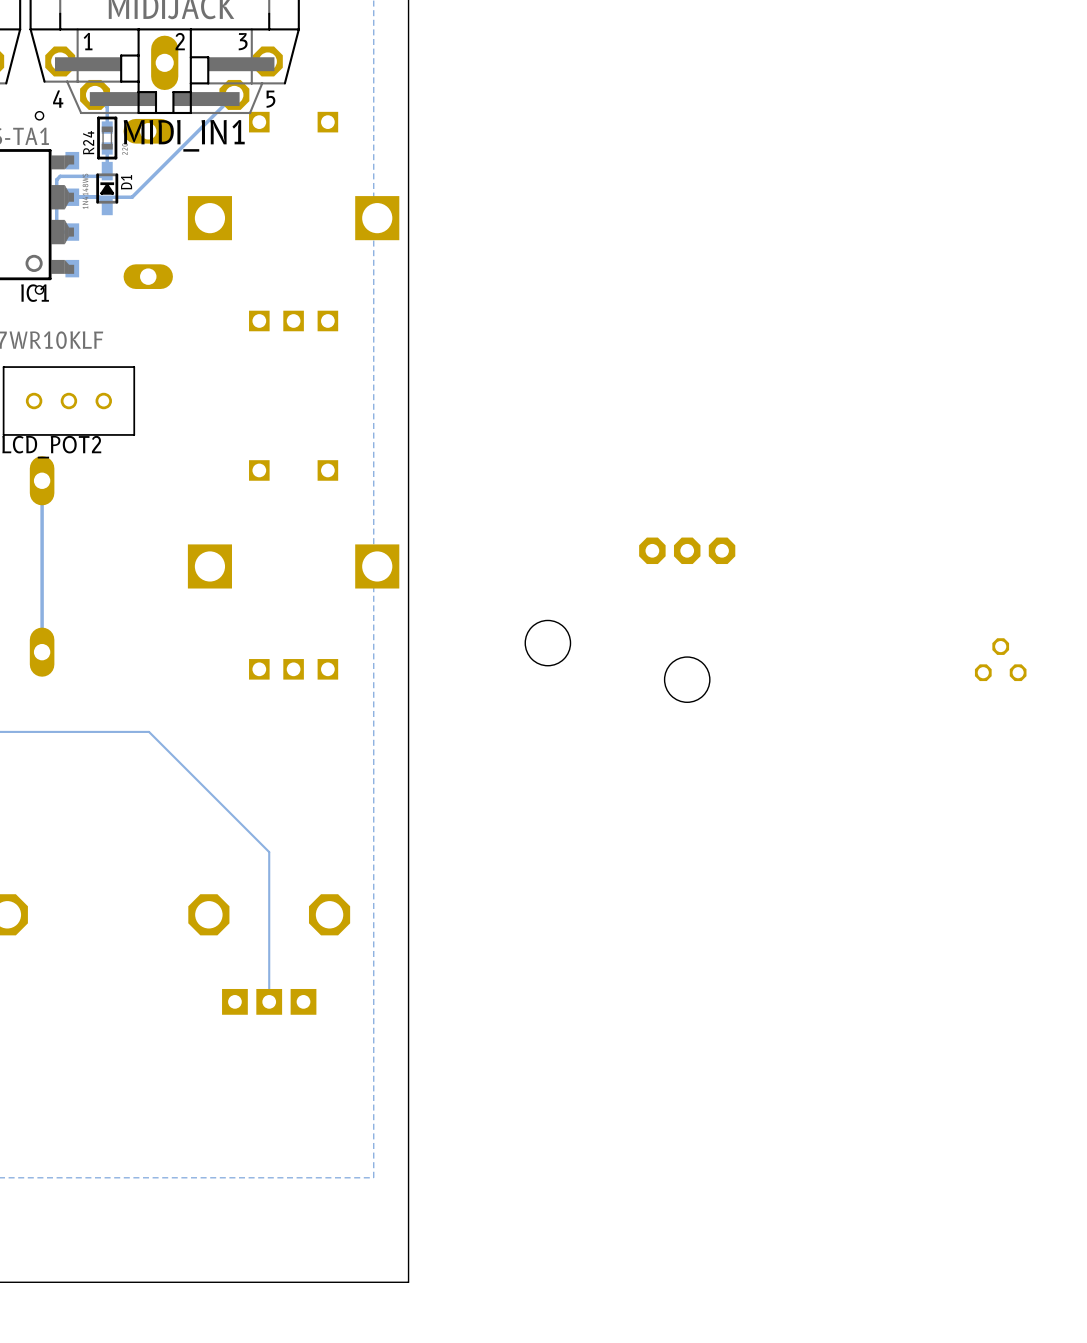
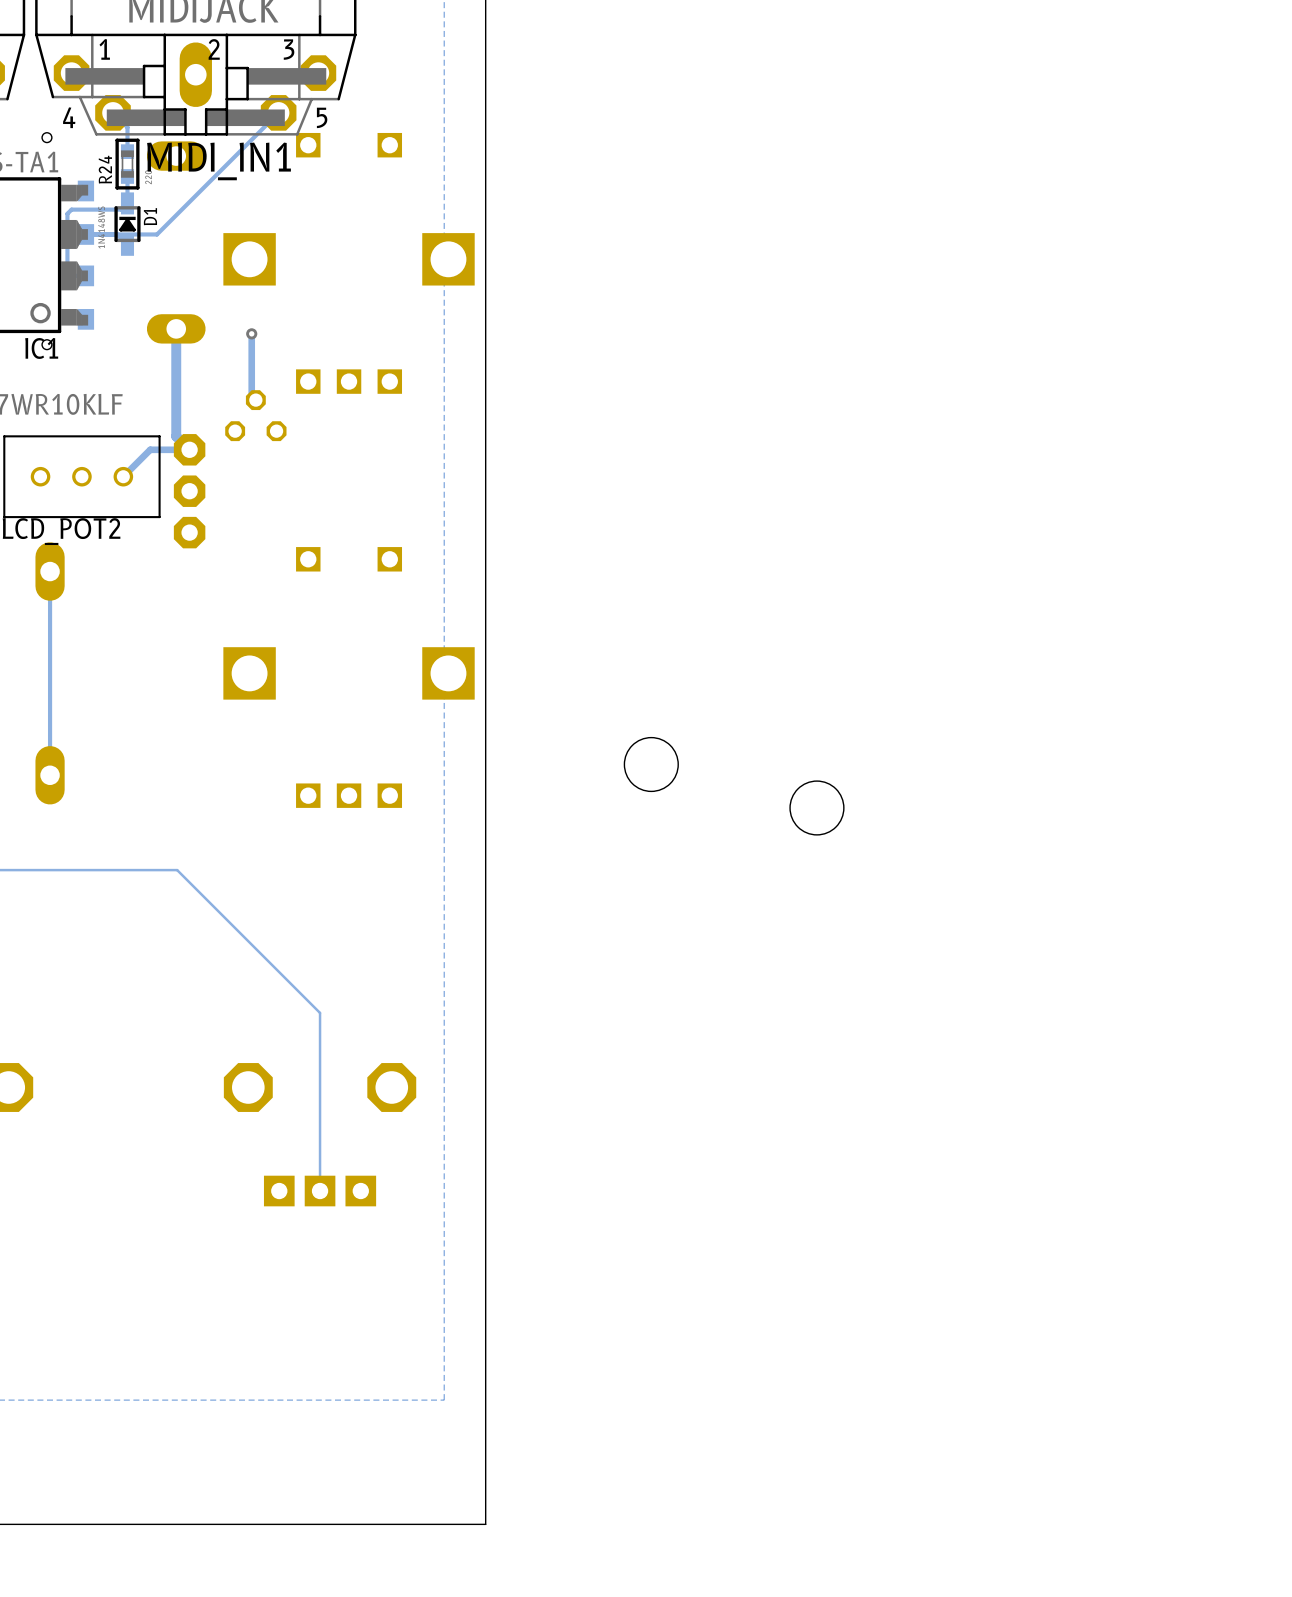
track: none -> (176, 328) (176, 436) (189, 449) (150, 449) (123, 476)
track: none -> (251, 333) (251, 395) (255, 400)
via: none -> (251, 333)
part: none -> (255, 415)
part: none -> (189, 491)
part: (687, 550) -> none
part: (1000, 659) -> none

